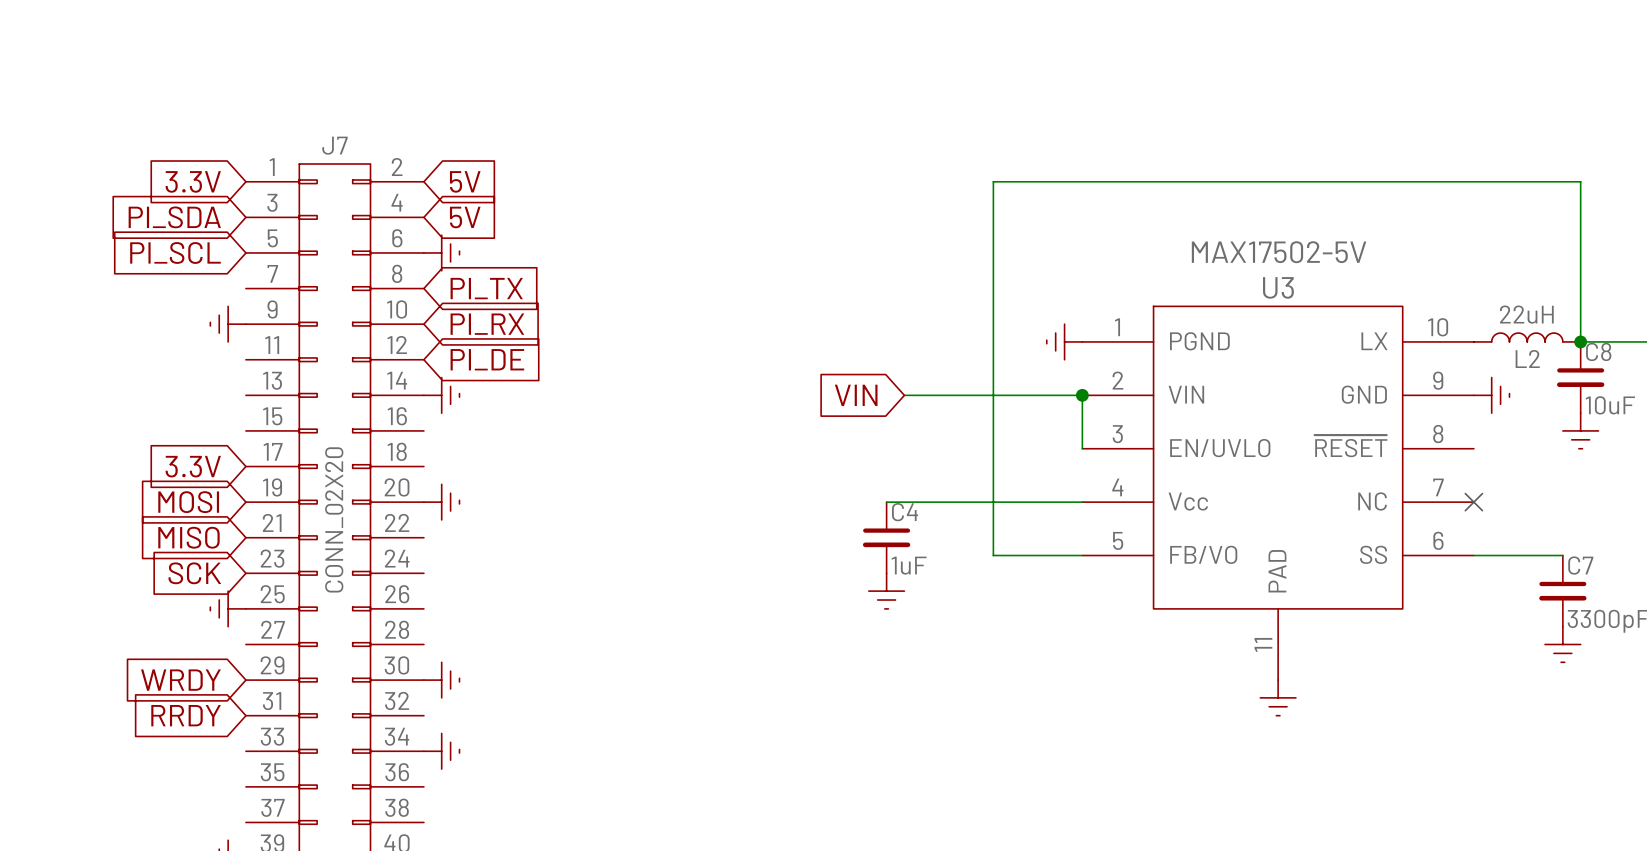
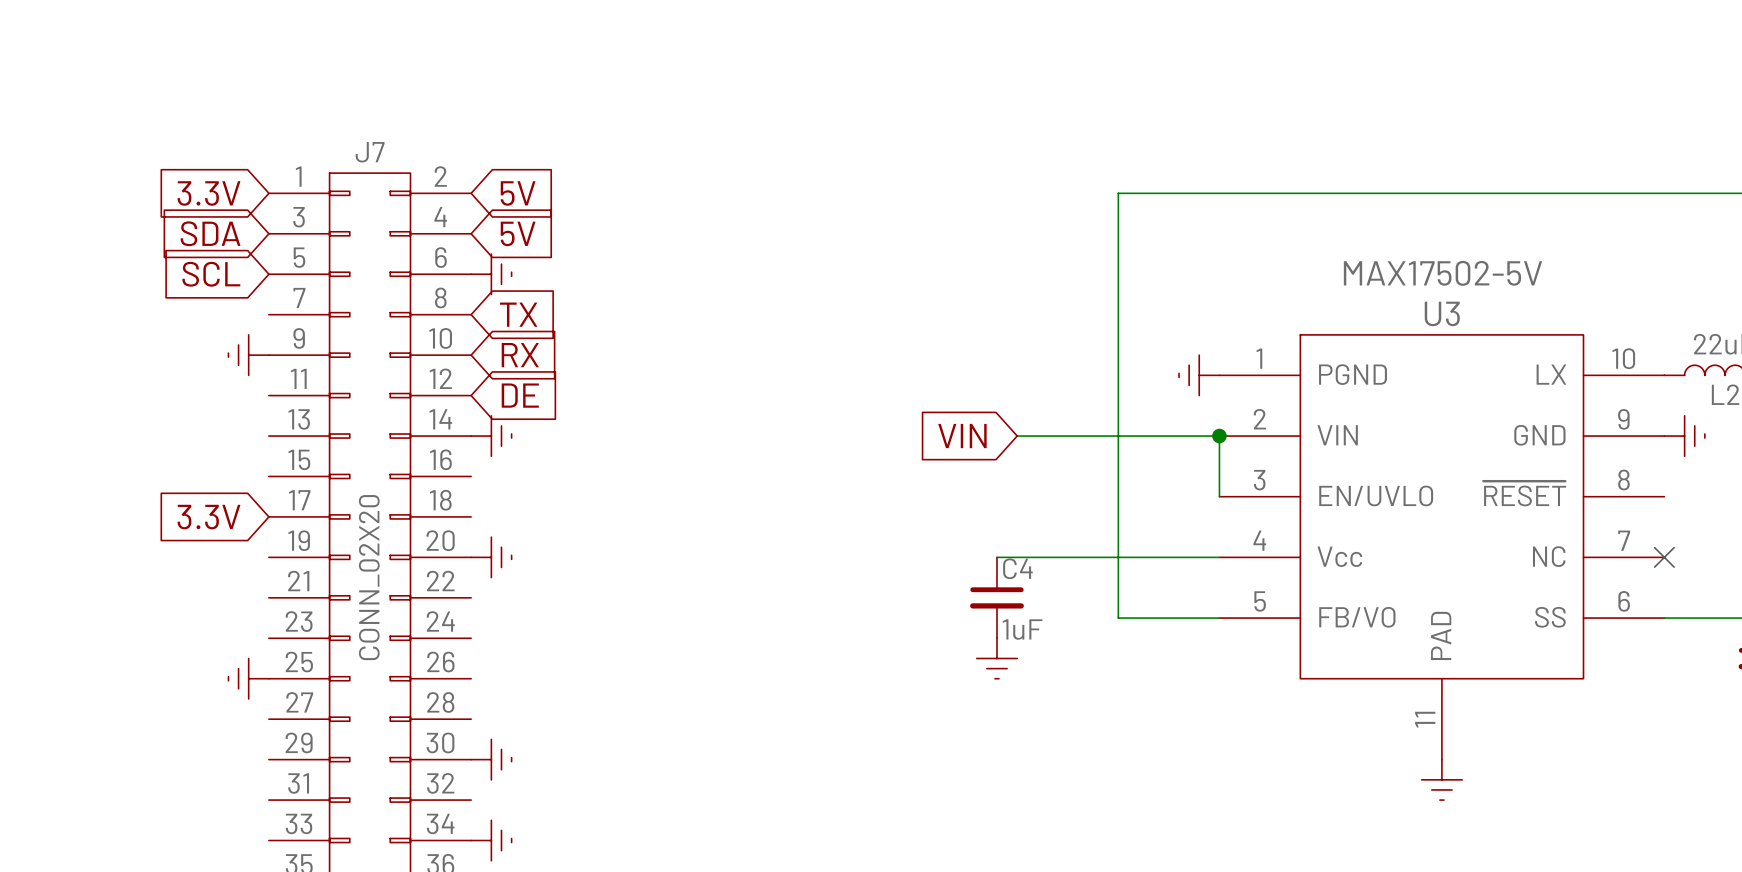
global label: PI_SDA (174, 217) -> SDA (210, 233)
global label: PI_SCL (175, 252) -> SCL (211, 274)
global label: PI_TX (486, 288) -> TX (518, 314)
global label: PI_RX (487, 324) -> RX (520, 355)
global label: PI_DE (487, 359) -> DE (520, 395)
global label: MOSI (188, 502) -> none
global label: MISO (188, 537) -> none
global label: SCK (194, 573) -> none
global label: WRDY (180, 680) -> none
global label: RRDY (186, 715) -> none

